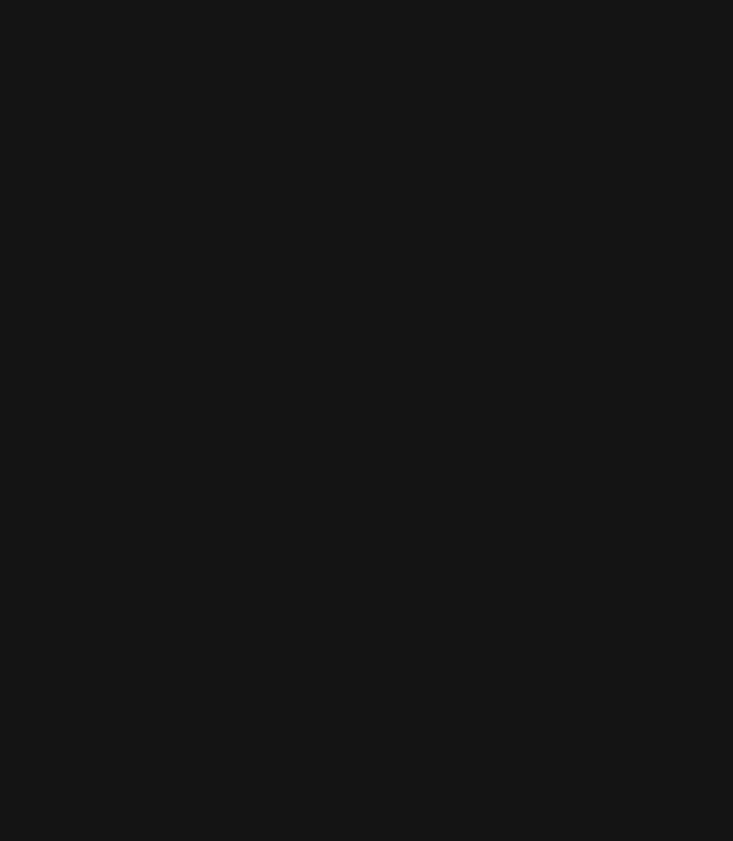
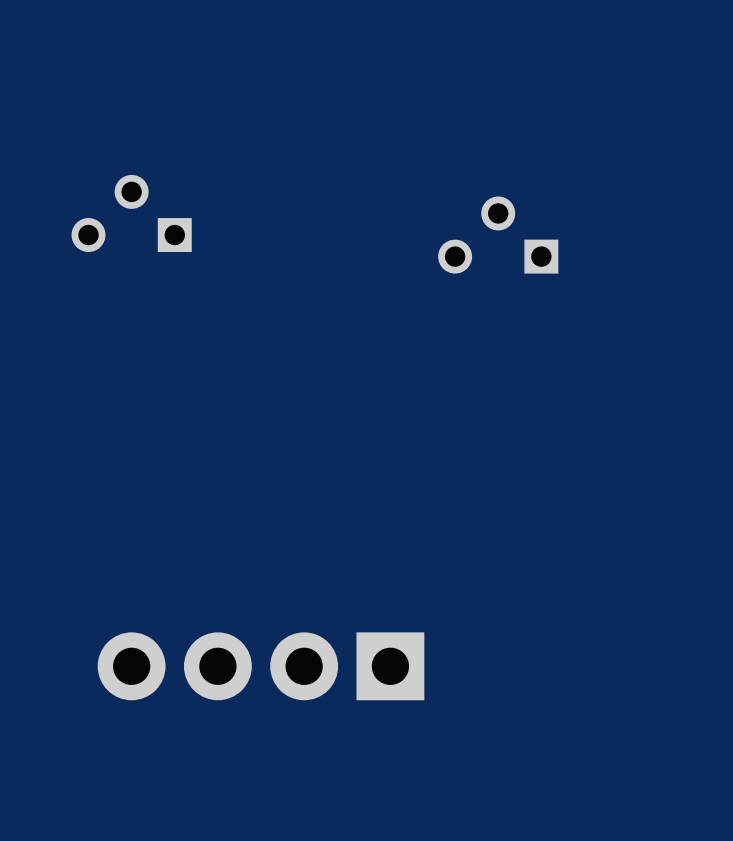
part: none -> (131, 213)
part: none -> (498, 235)
part: none -> (261, 666)

